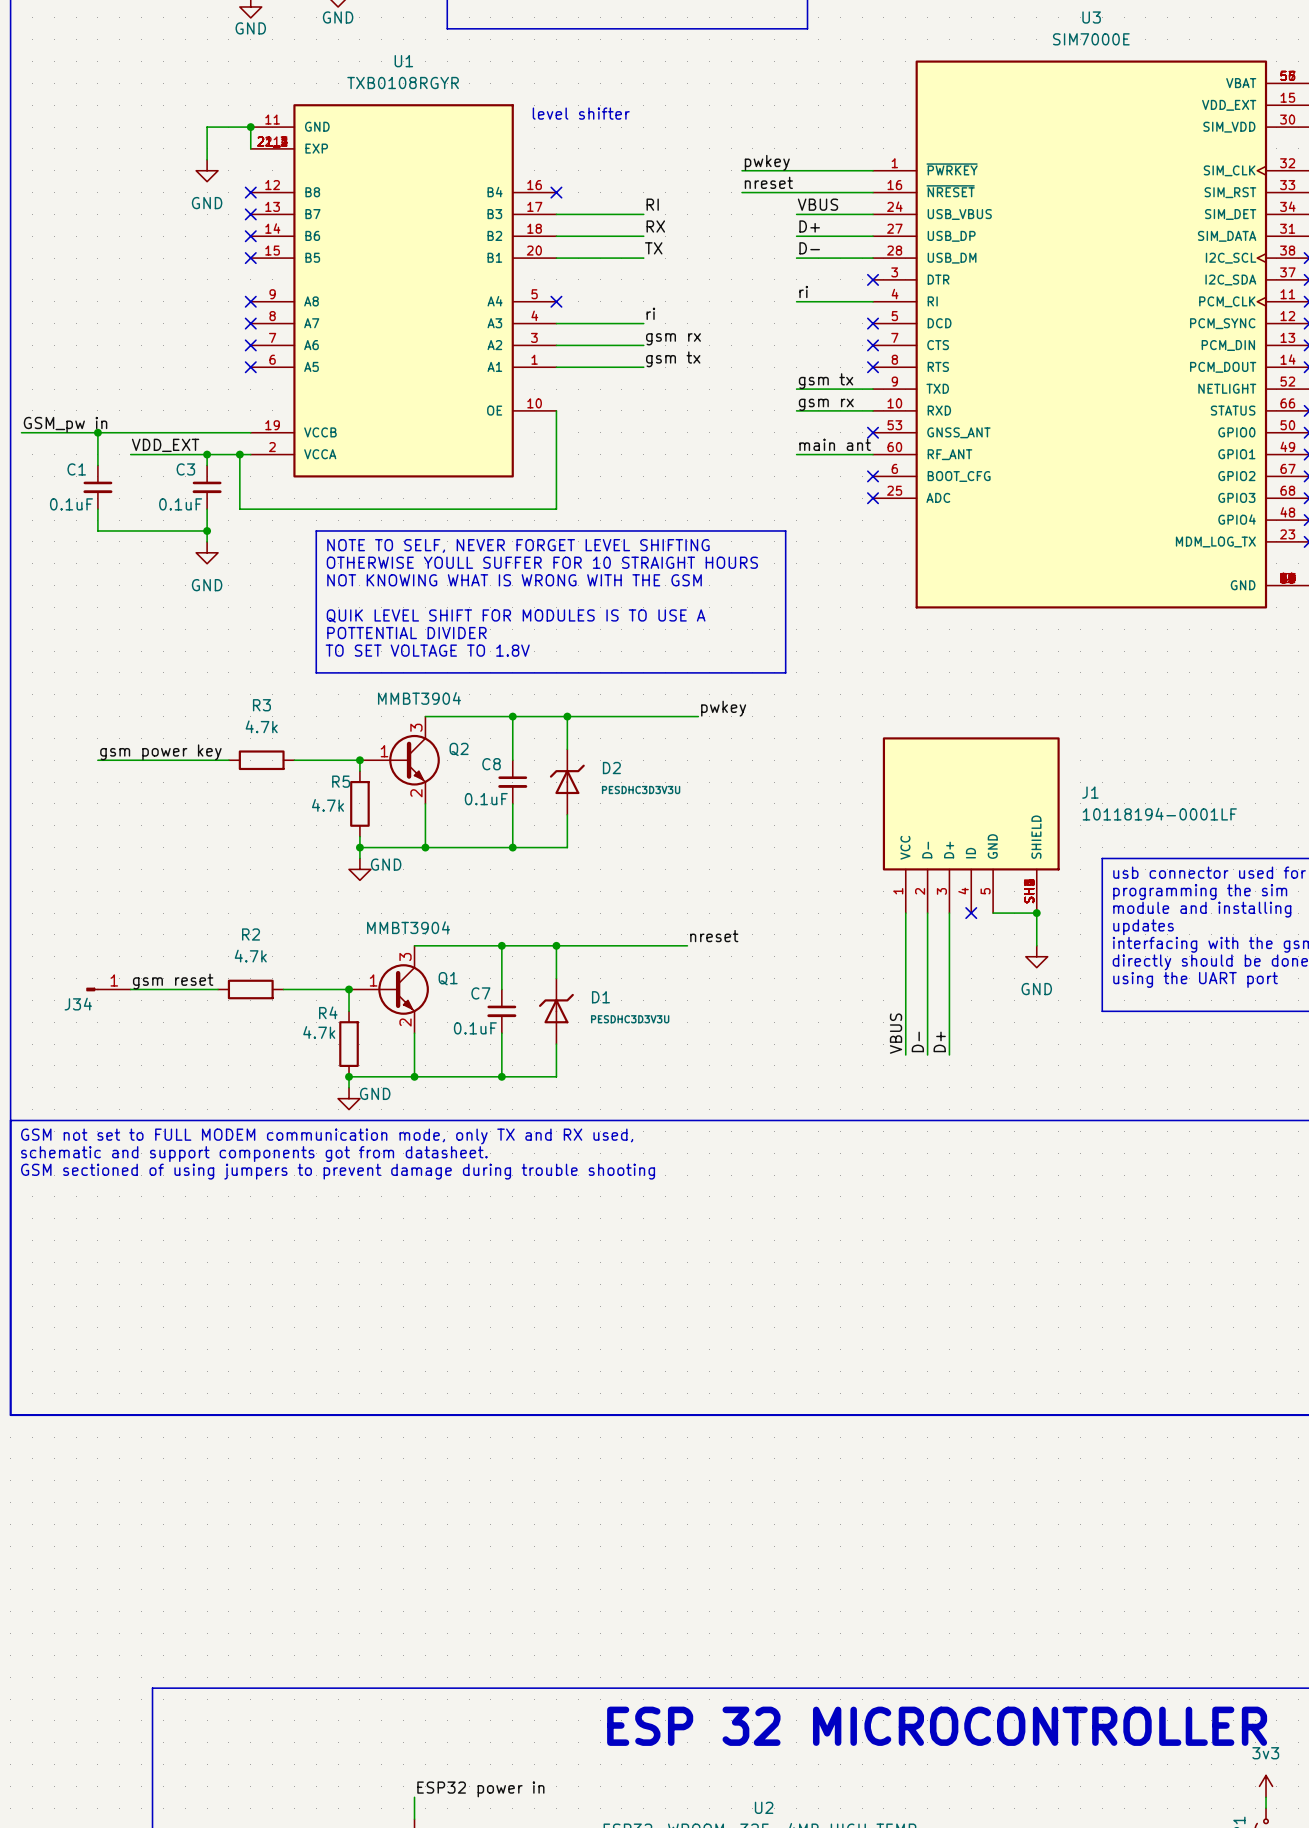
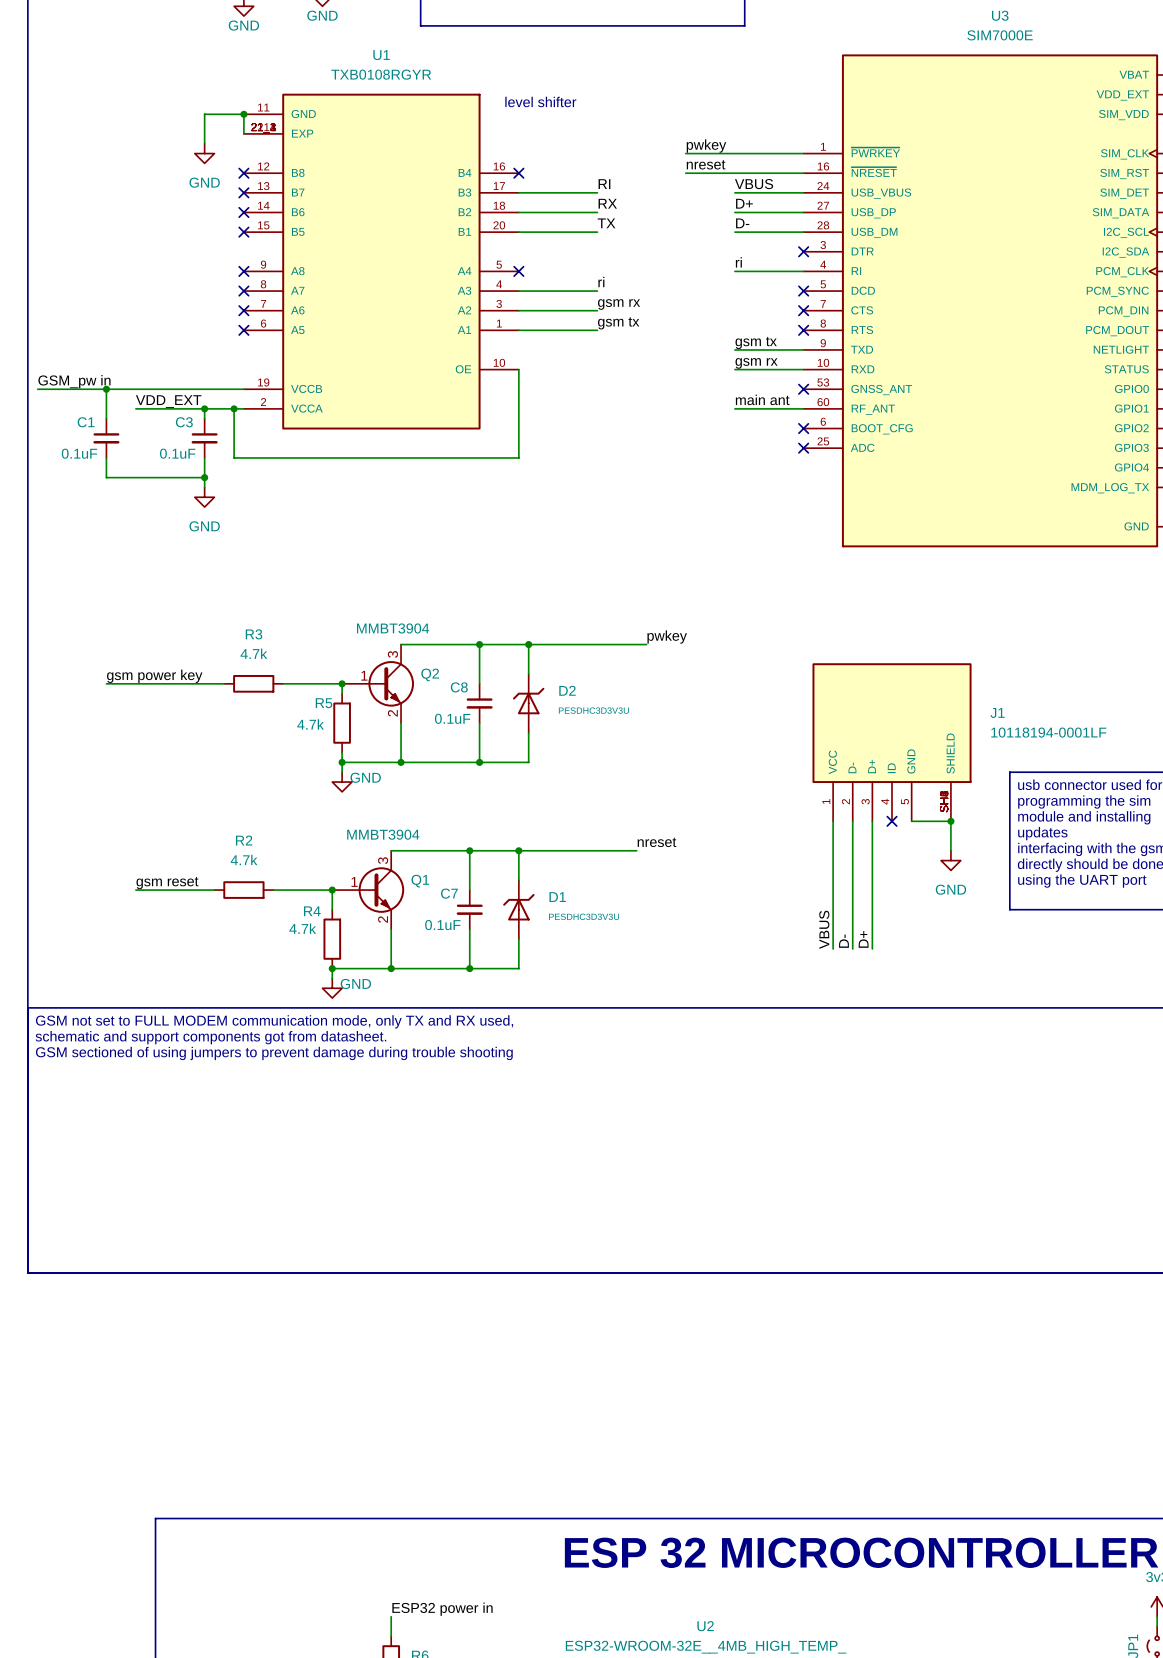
line: (316, 530) (785, 530) (785, 672) (316, 672) (316, 530) -> none
text: NOTE TO SELF, NEVER FORGET LEVEL SHIFTING (518, 545) -> none
text: OTHERWISE YOULL SUFFER FOR 10 STRAIGHT HOURS (542, 562) -> none
text: NOT KNOWING WHAT IS WRONG WITH THE GSM (514, 580) -> none
text: QUIK LEVEL SHIFT FOR MODULES IS TO USE A (516, 615) -> none
text: POTTENTIAL DIVIDER (406, 633) -> none
text: TO SET VOLTAGE TO 1.8V (427, 650) -> none
J34: (108, 989) -> none

